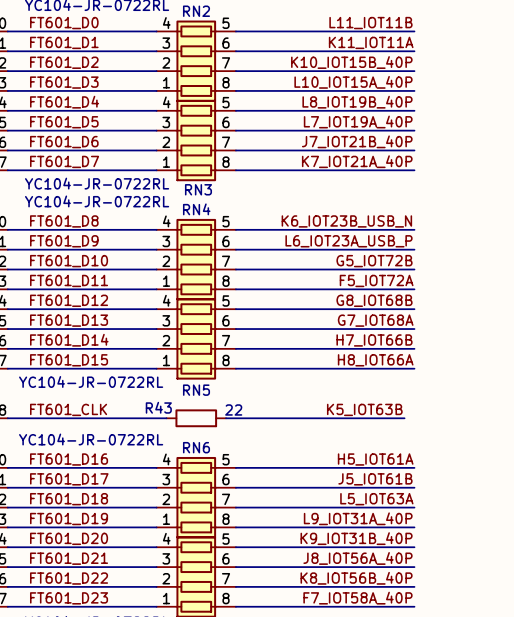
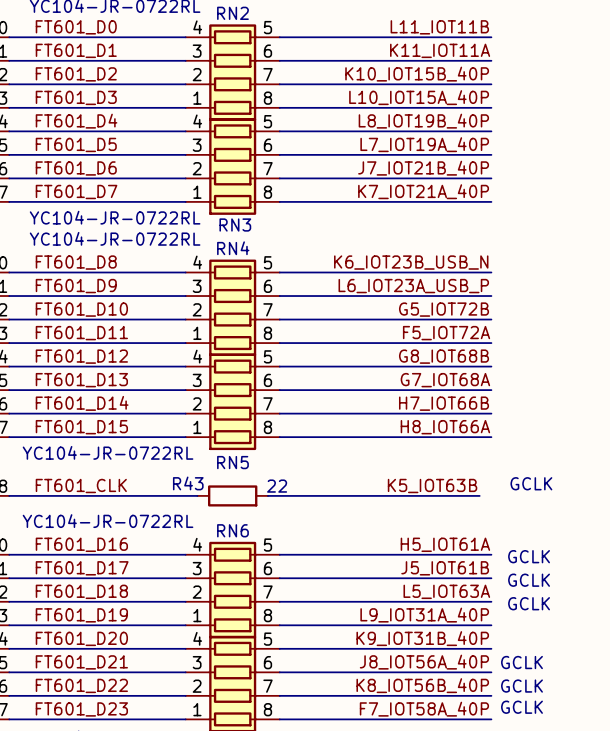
text: none -> GCLK (531, 483)
text: none -> GCLK (529, 556)
text: none -> GCLK (529, 580)
text: none -> GCLK (529, 603)
text: none -> GCLK (522, 662)
text: none -> GCLK (522, 686)
text: none -> GCLK (522, 707)

